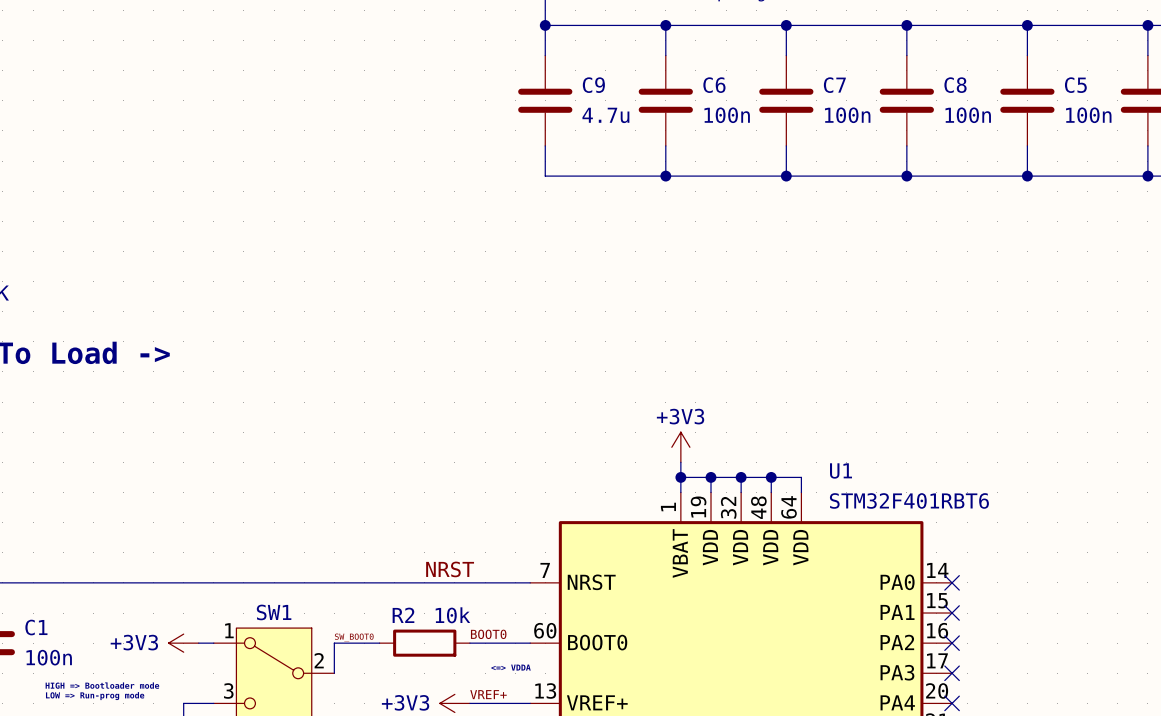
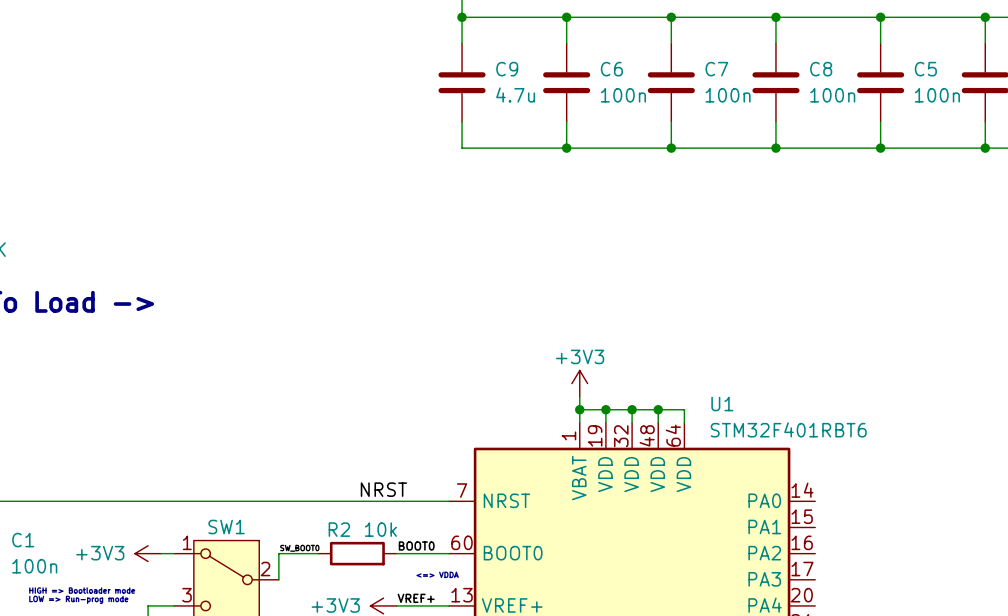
no-connect mark: (952, 582) -> none
no-connect mark: (952, 613) -> none
no-connect mark: (952, 643) -> none
no-connect mark: (952, 673) -> none
no-connect mark: (952, 703) -> none

